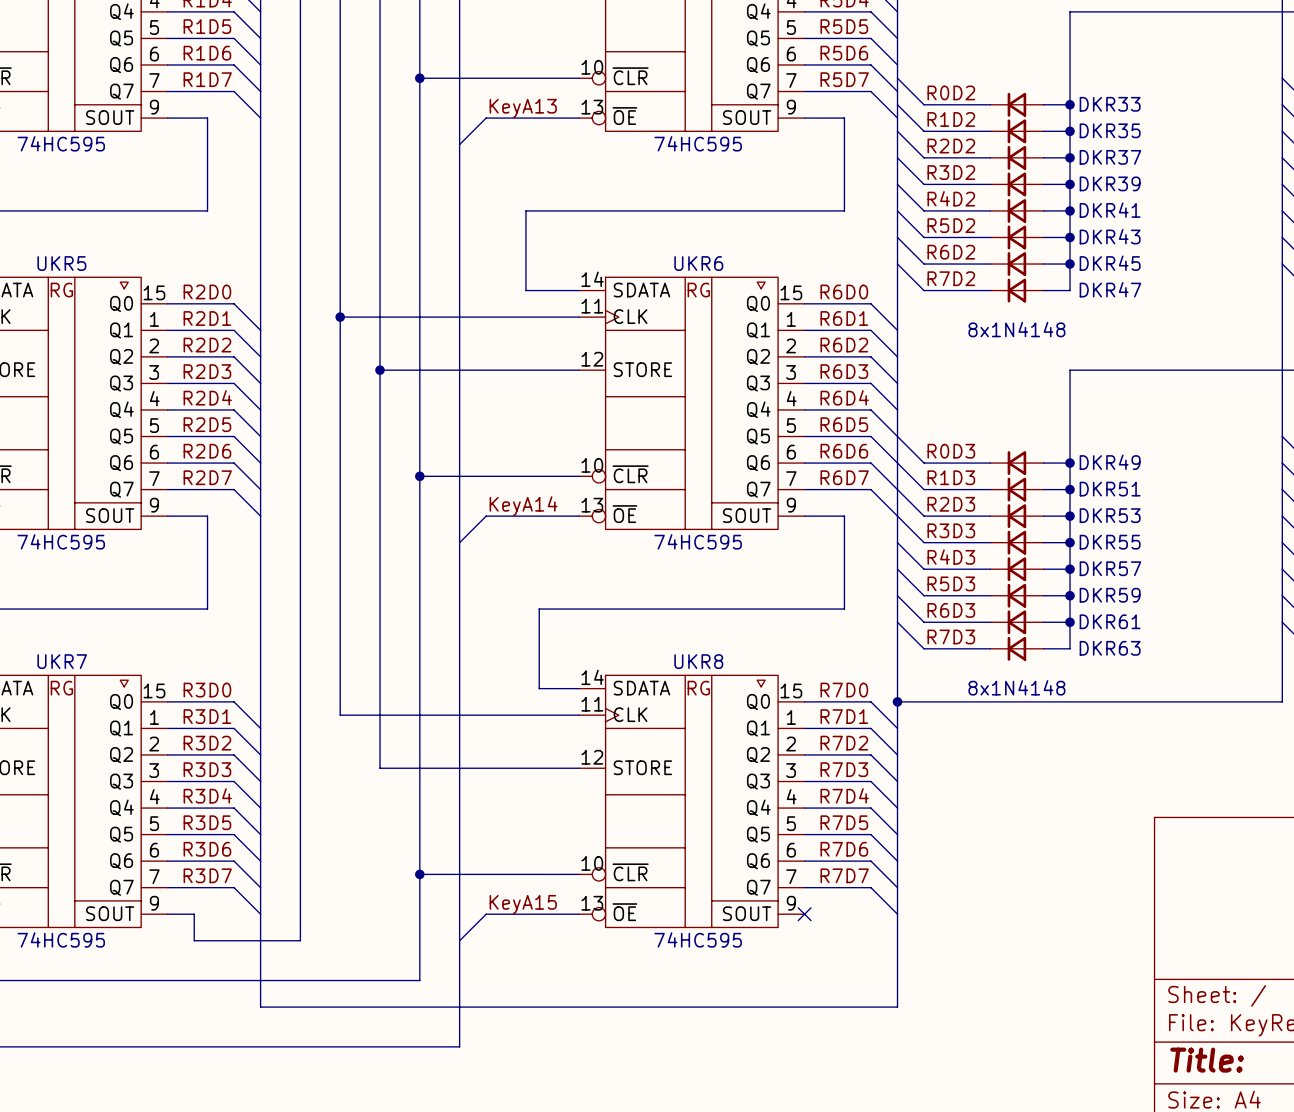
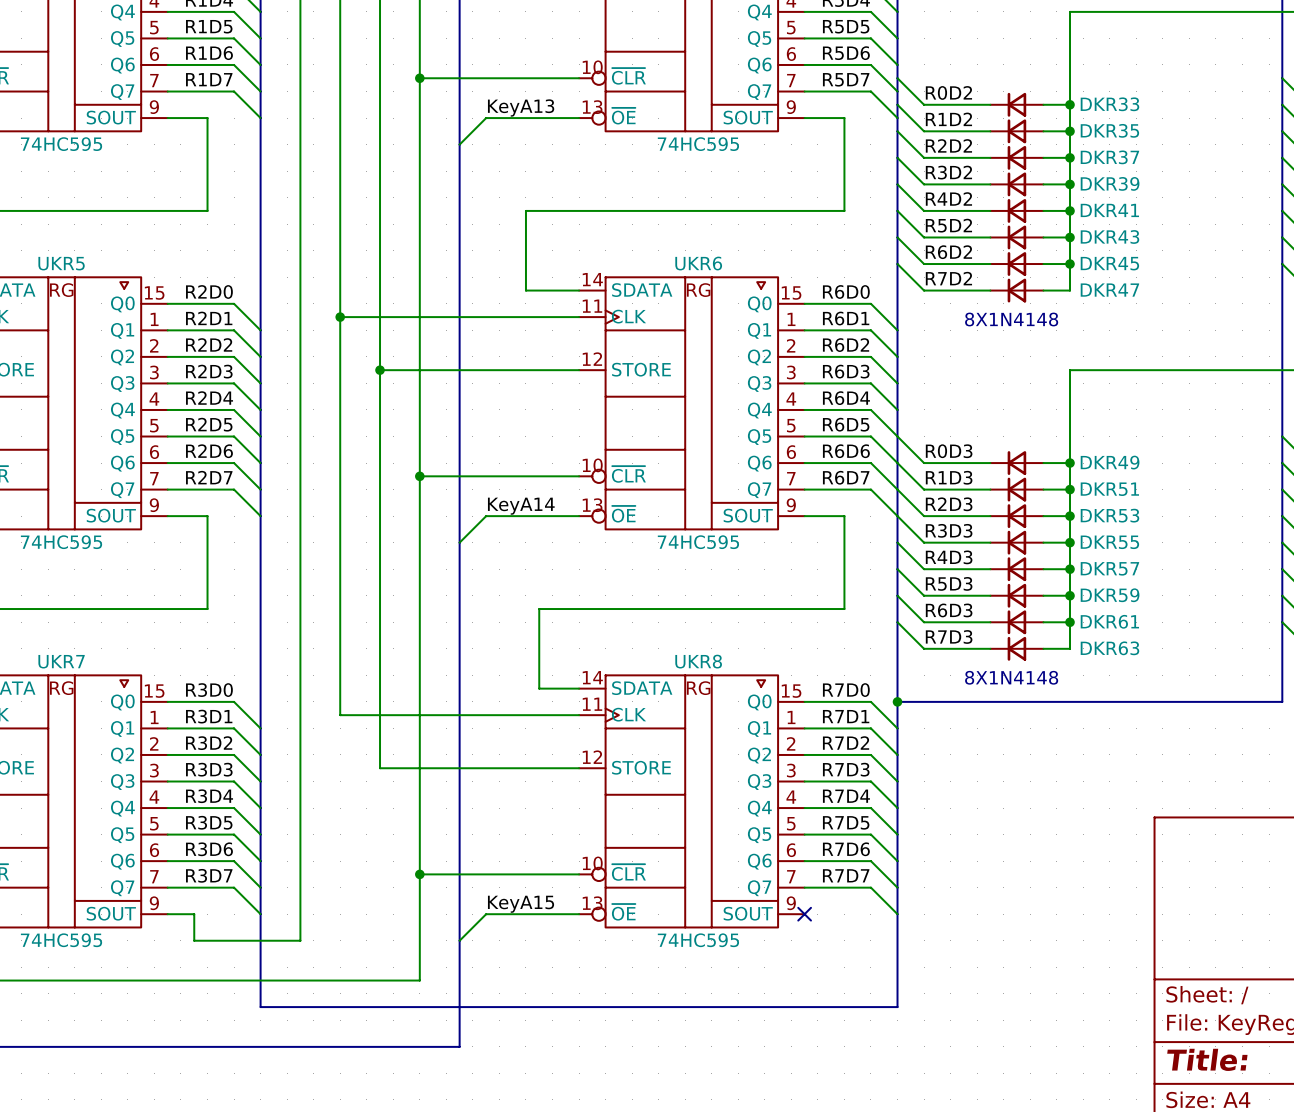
text: none -> 8X1N4148 (1011, 319)
DKR47 value: 8x1N4148 (1016, 329) -> none
text: none -> 8X1N4148 (1011, 677)
DKR63 value: 8x1N4148 (1016, 687) -> none

